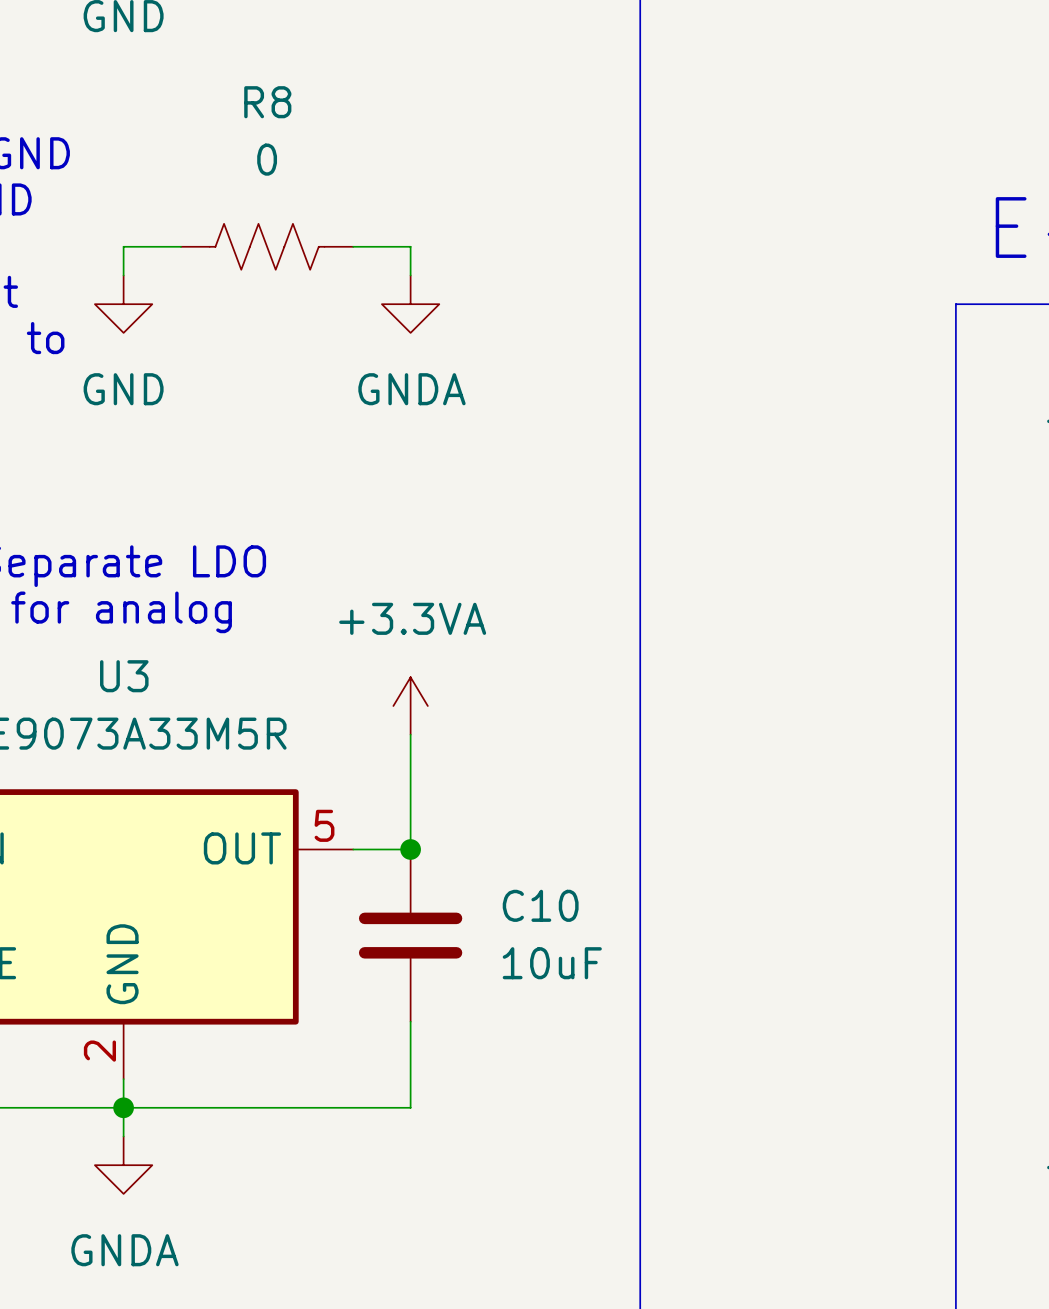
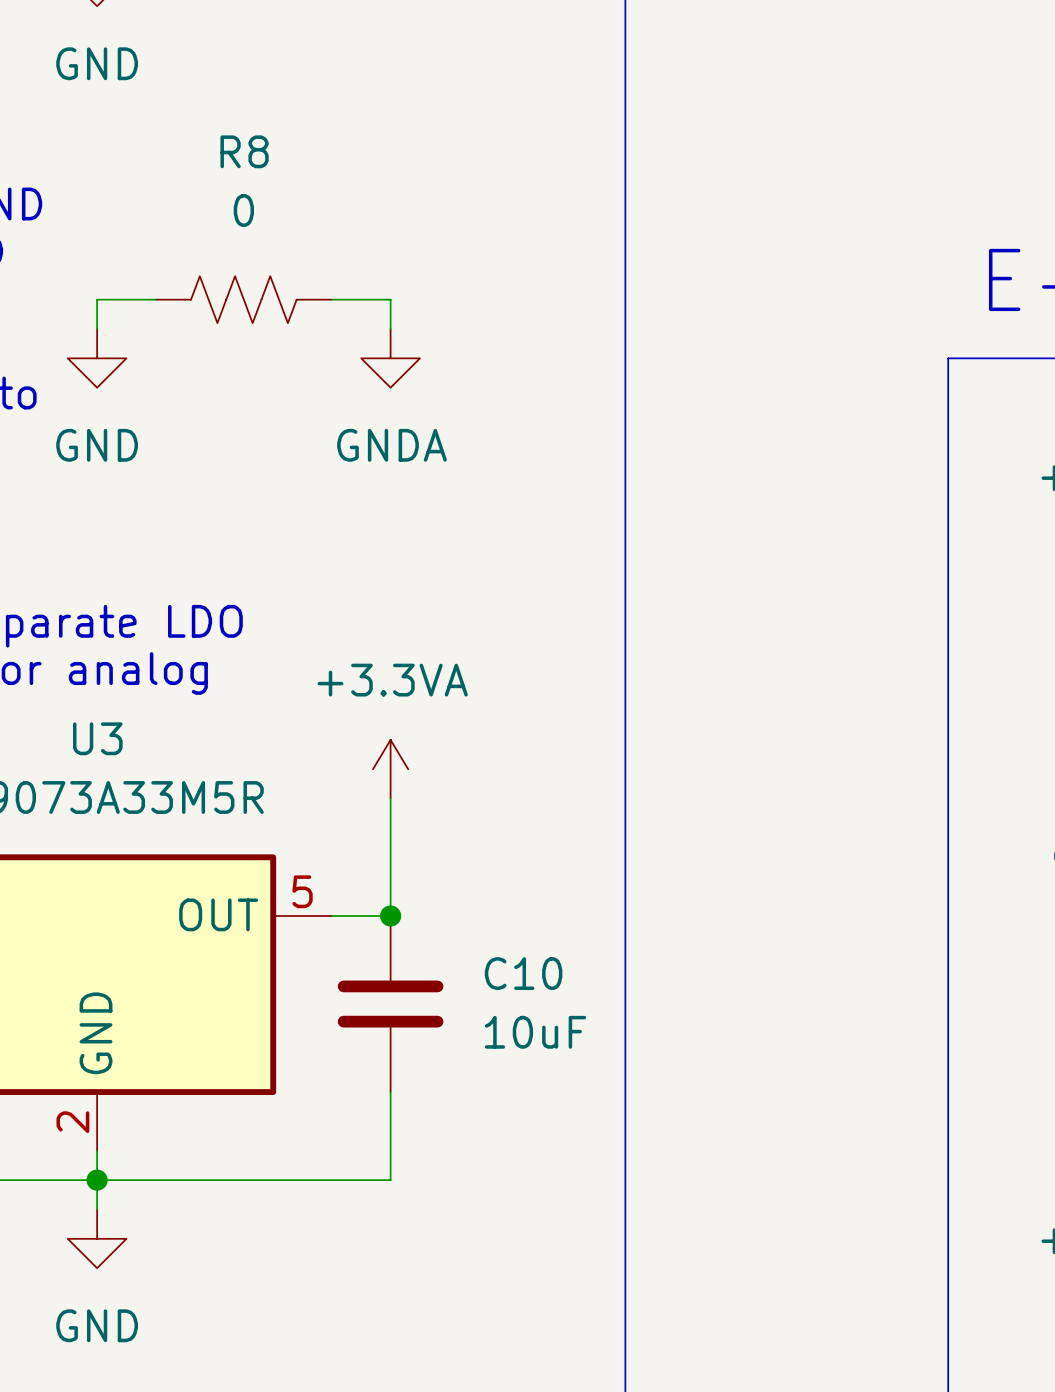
power symbol: GNDA (123, 1165) -> GND (97, 1238)

